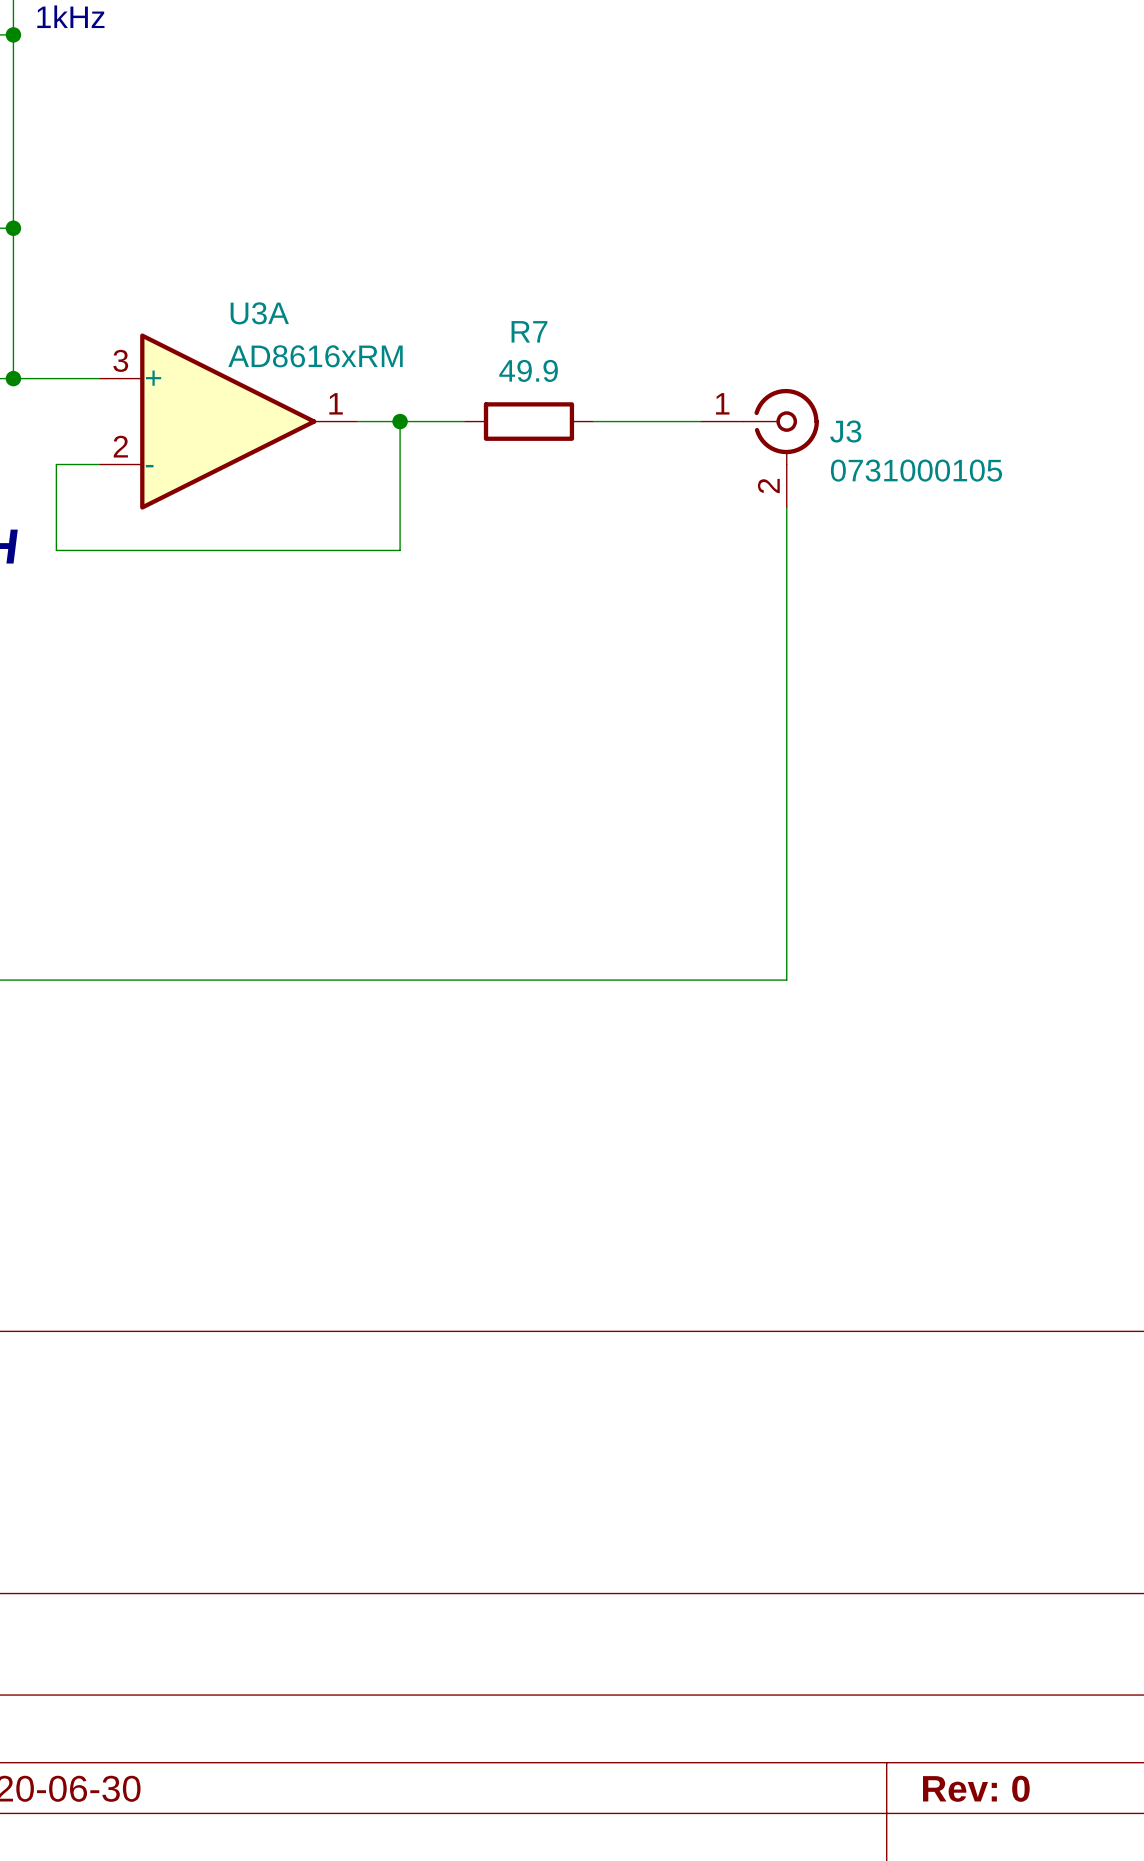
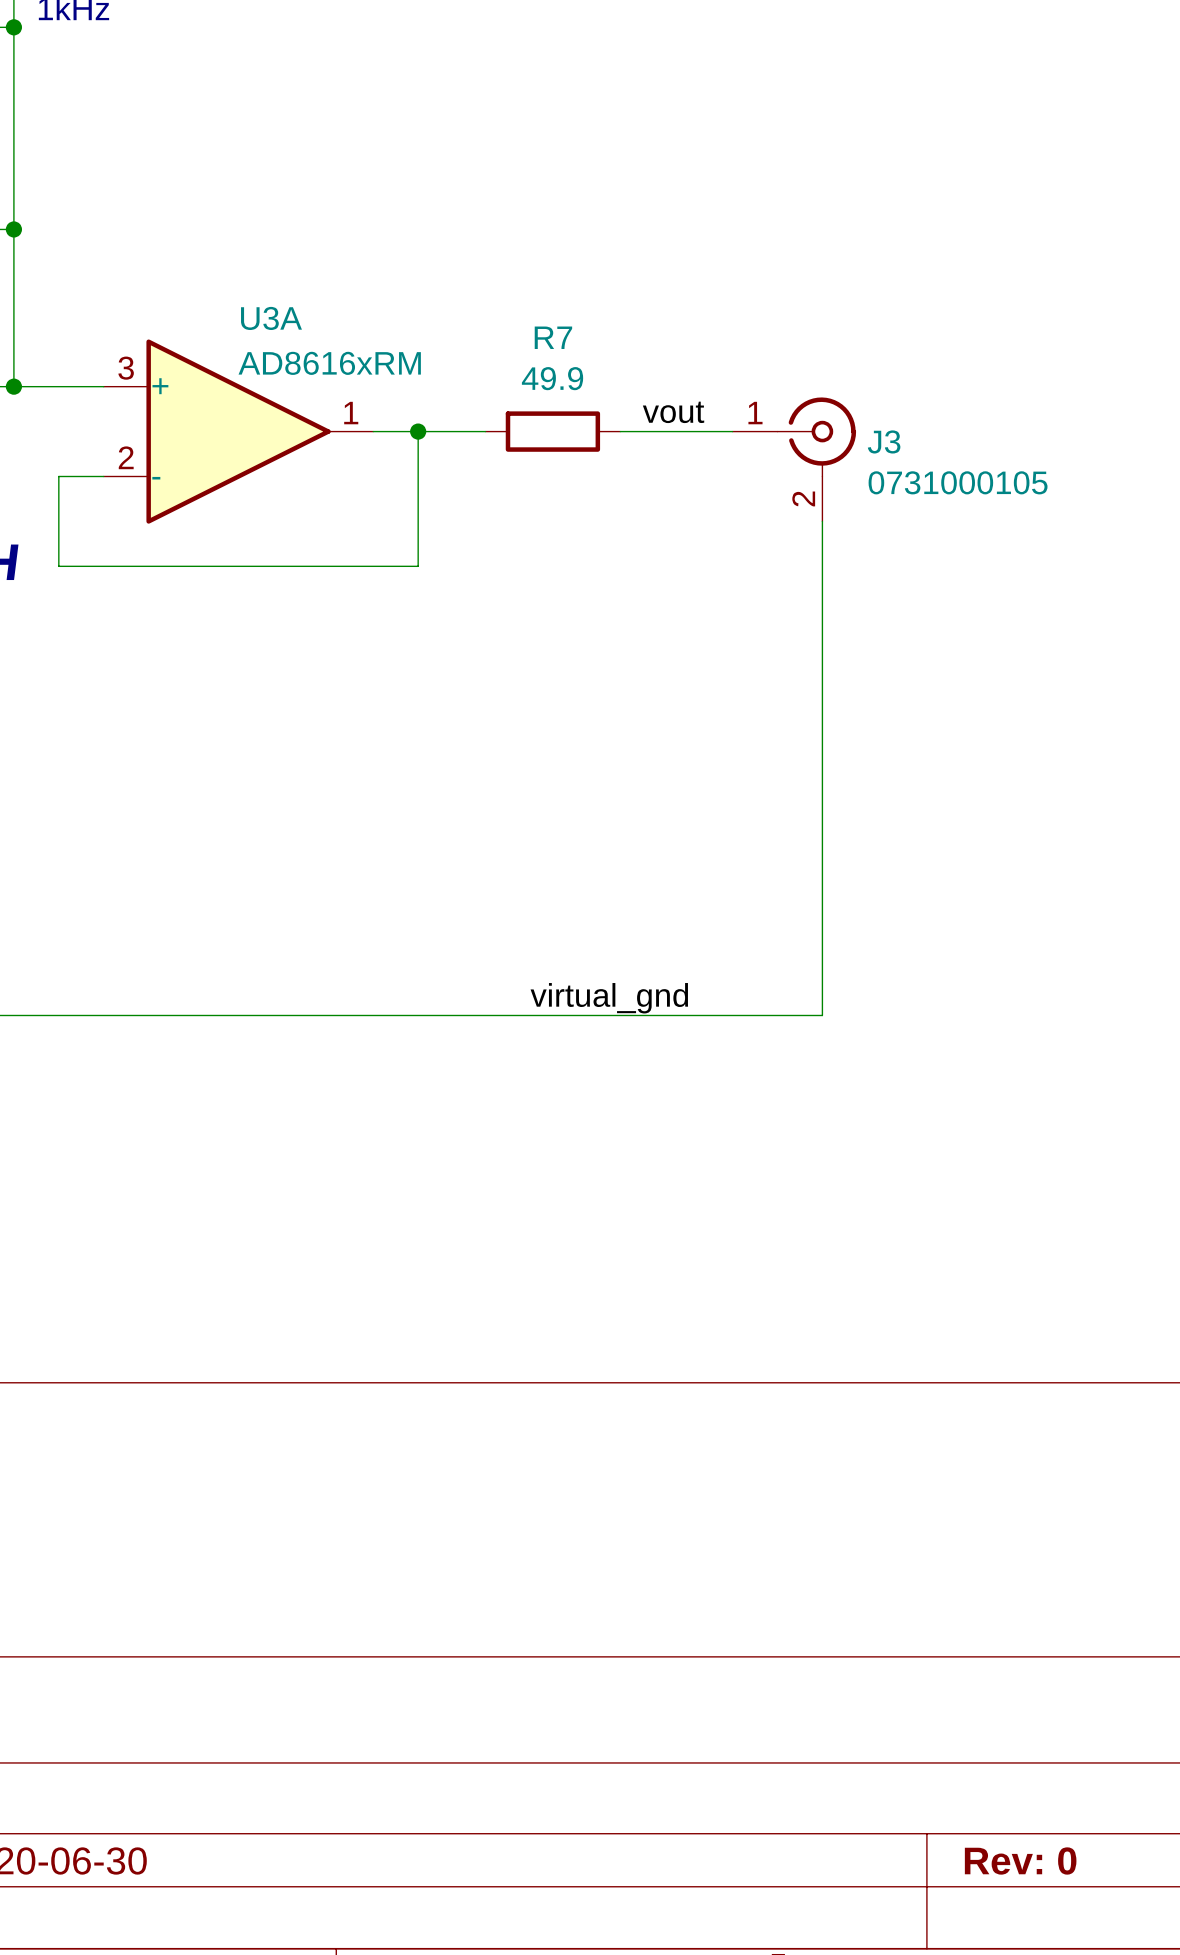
label: none -> vout (673, 412)
label: none -> virtual_gnd (609, 998)

